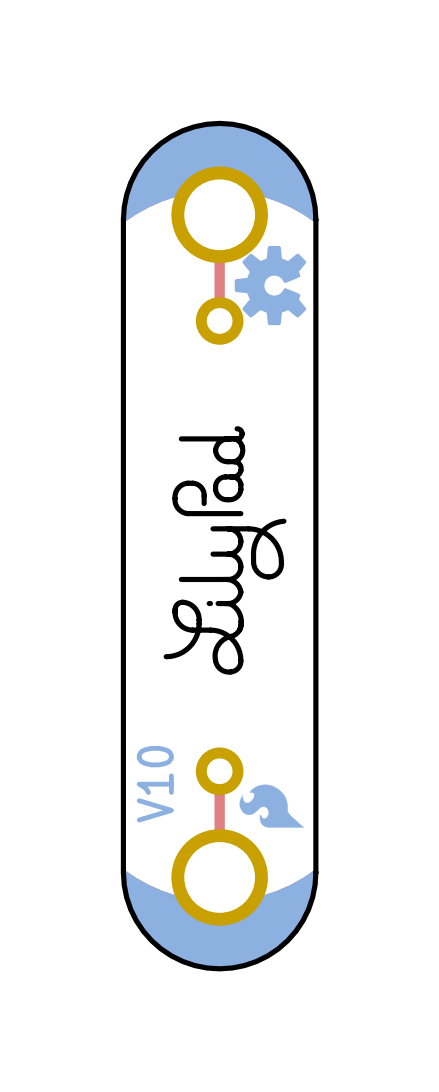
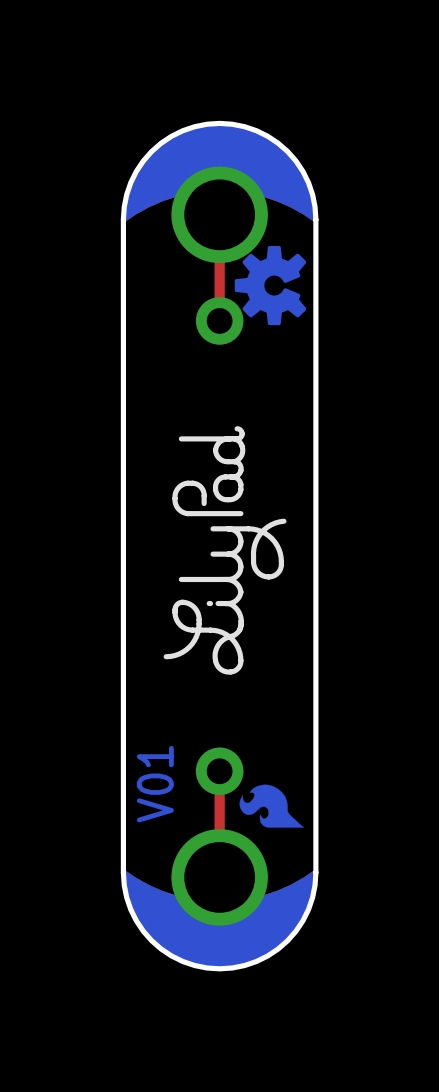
text: V10 (155, 784) -> V01 (155, 784)

